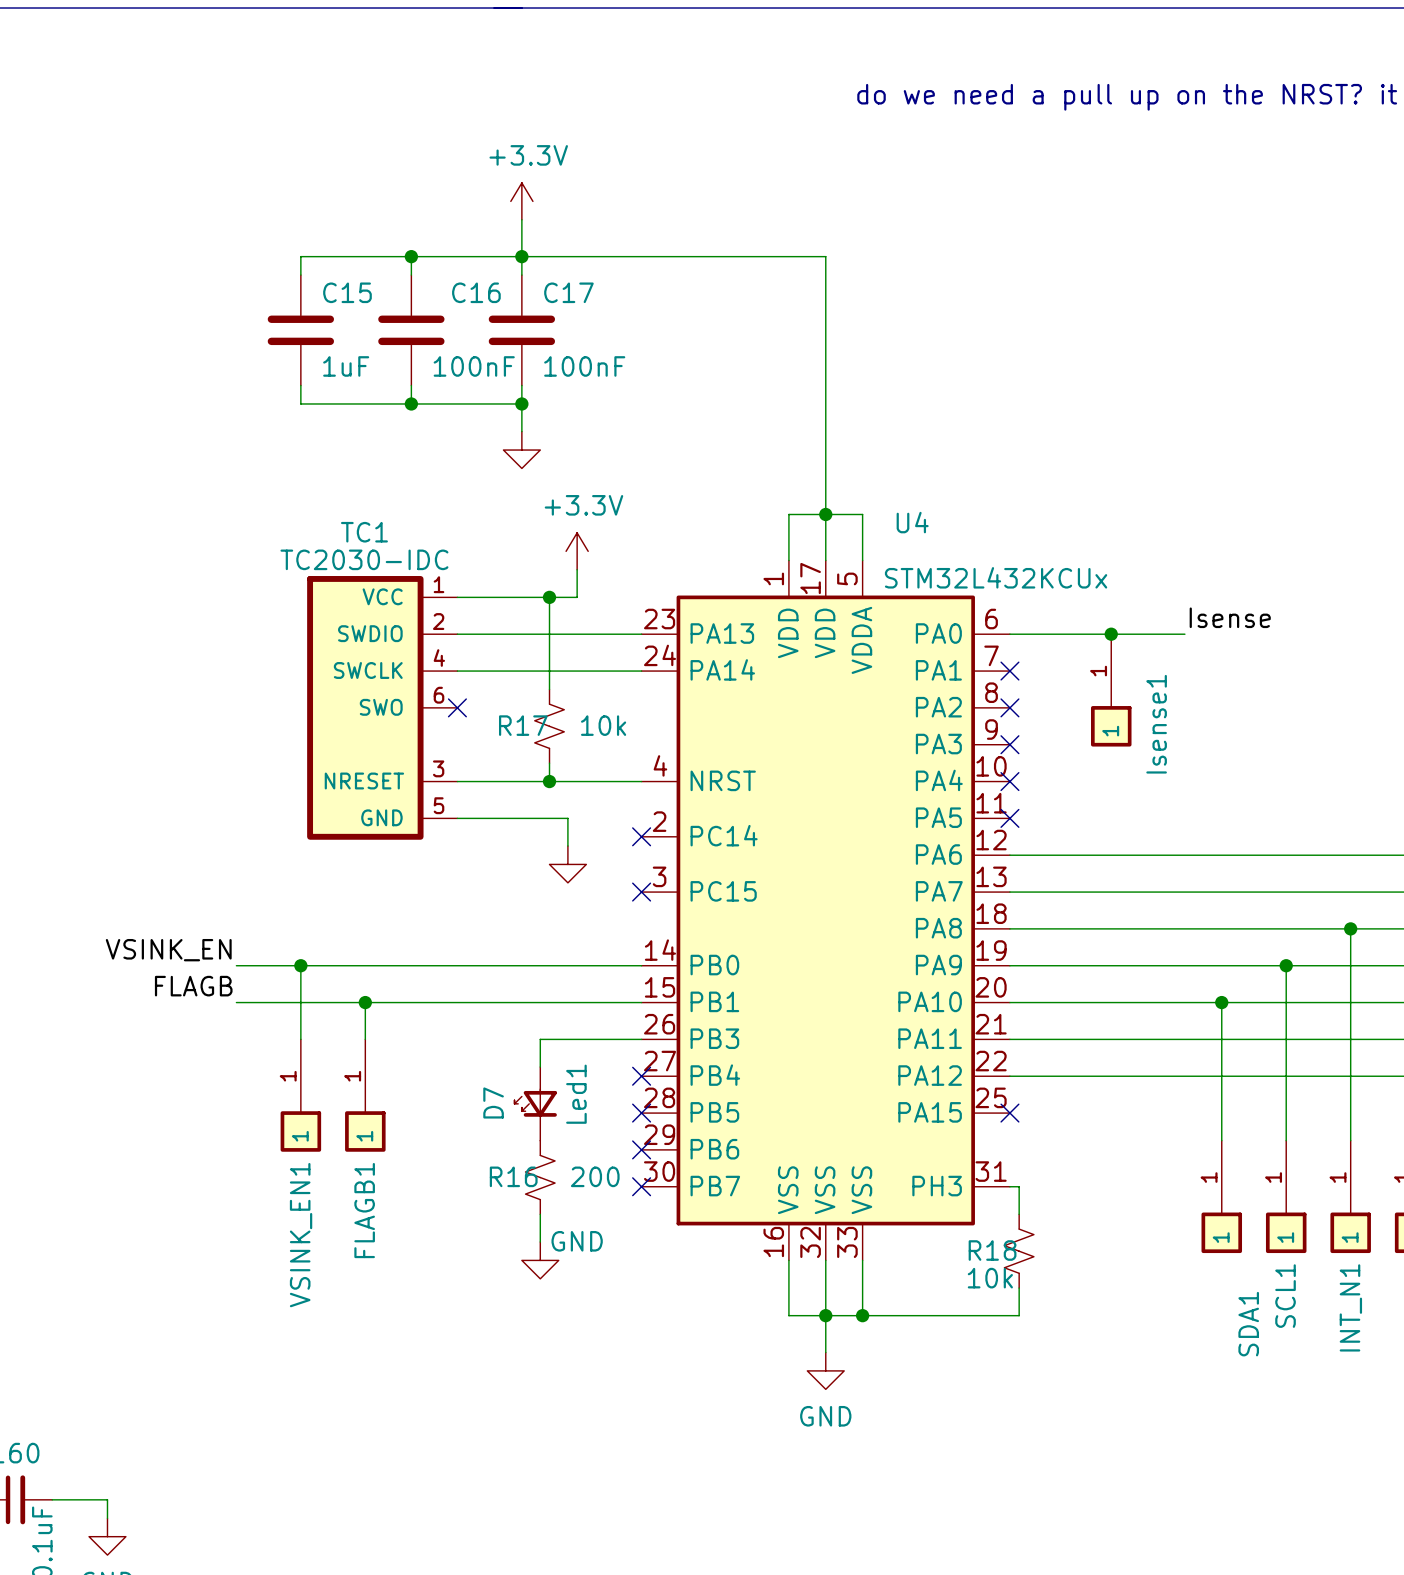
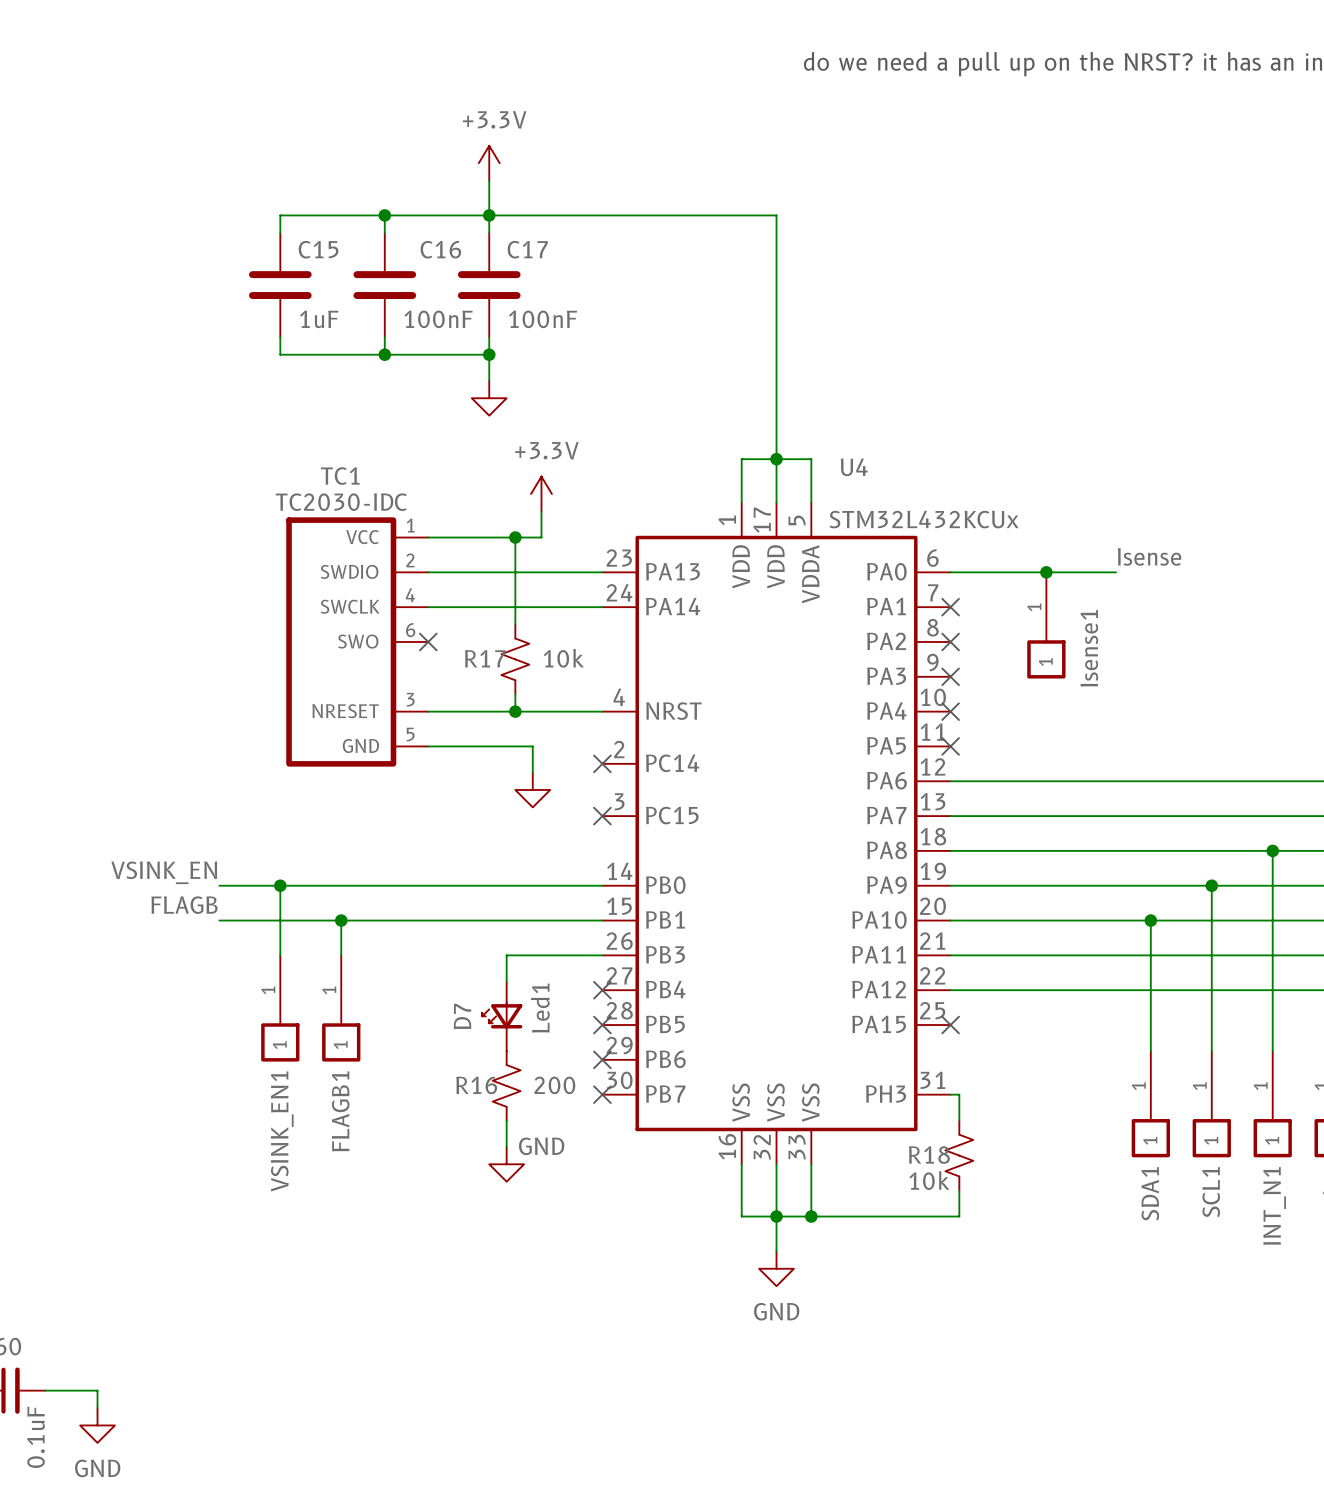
SDA1 name position: SDA1 (1248, 1324) -> SDA1 (1150, 1193)

